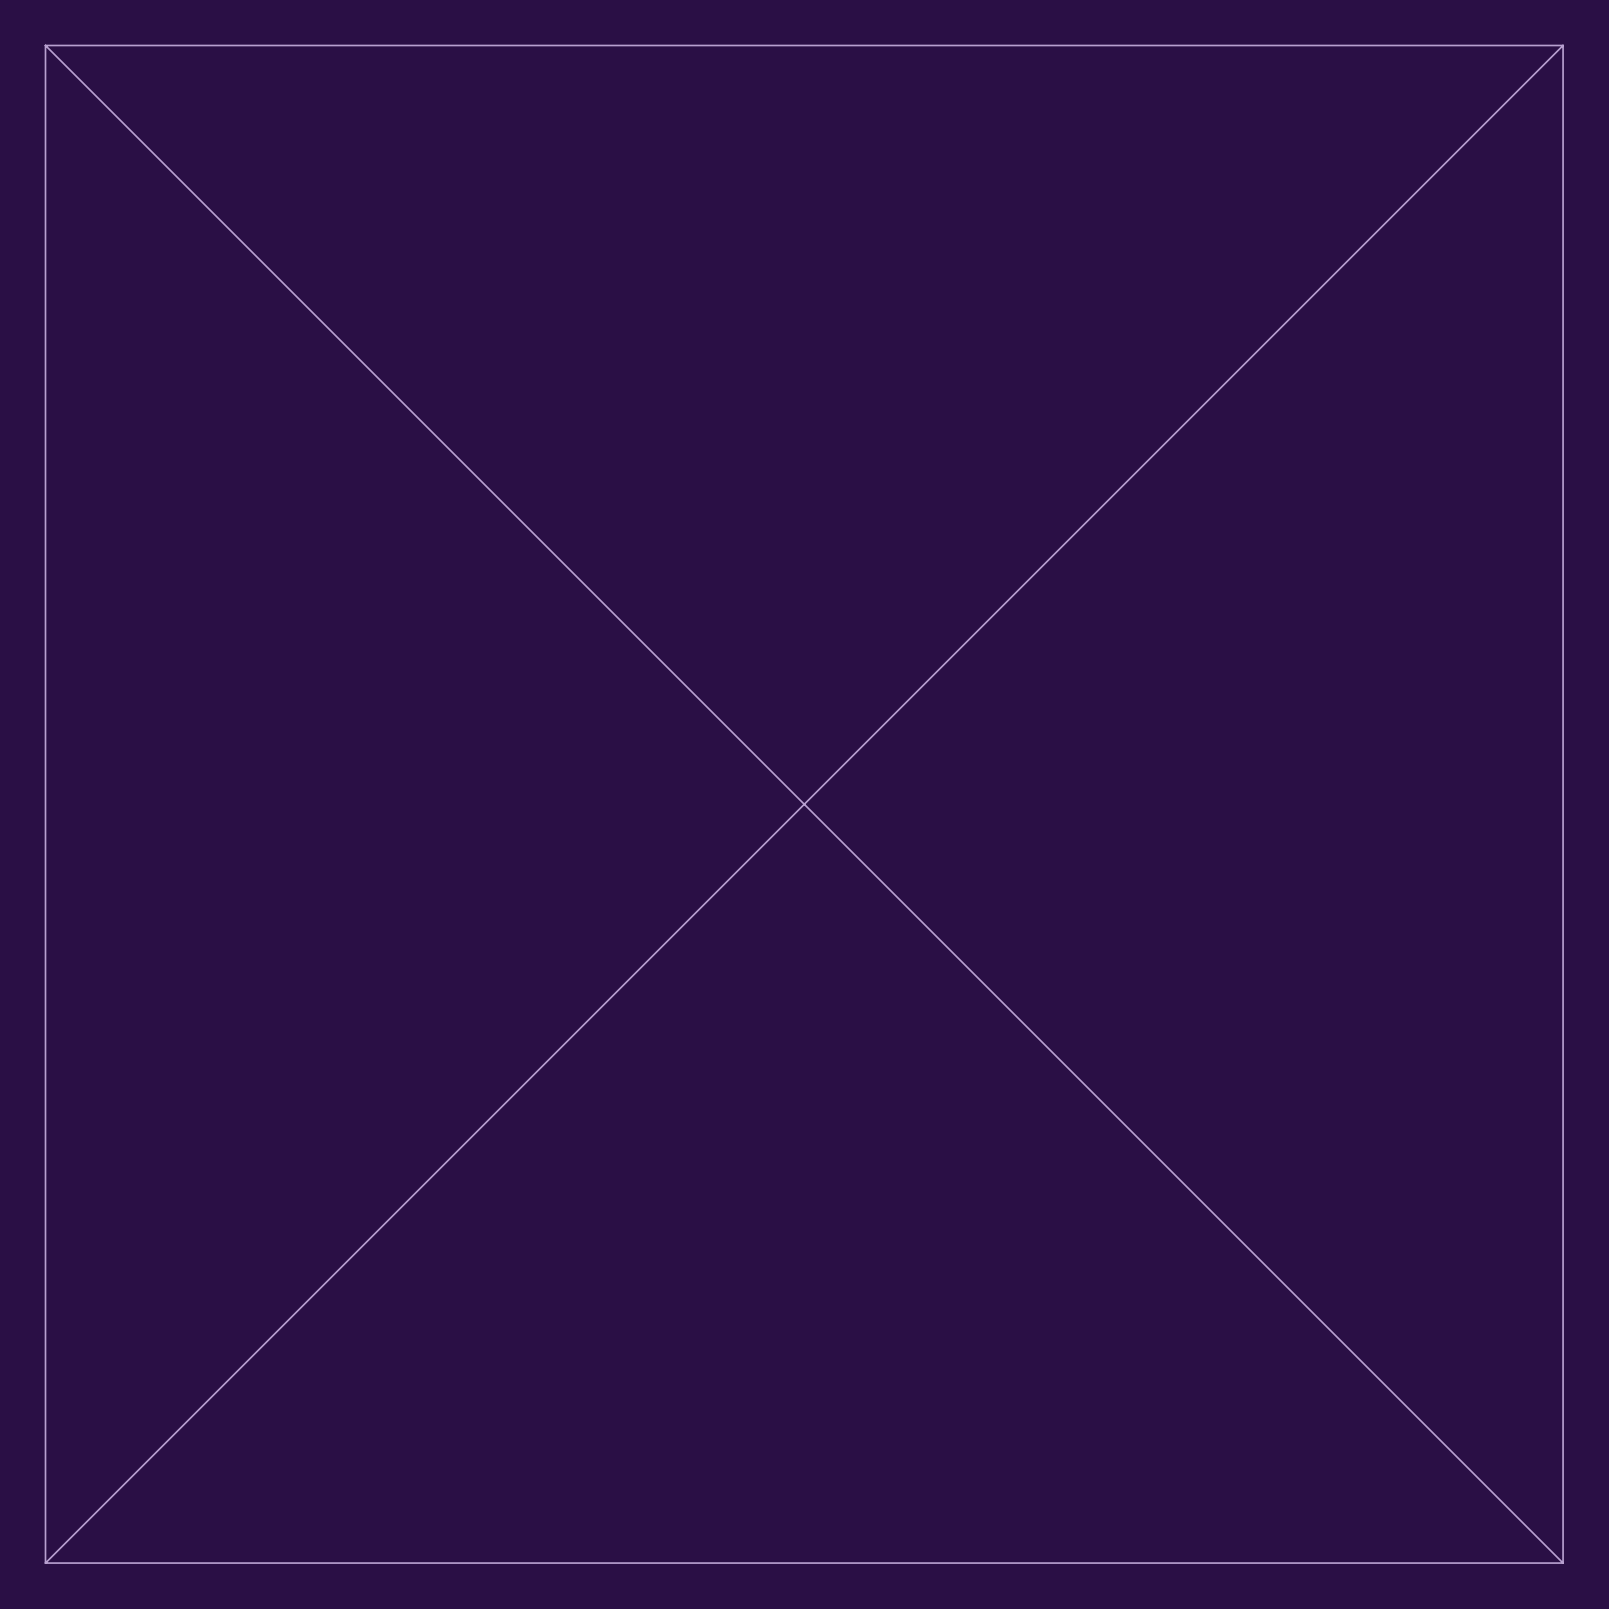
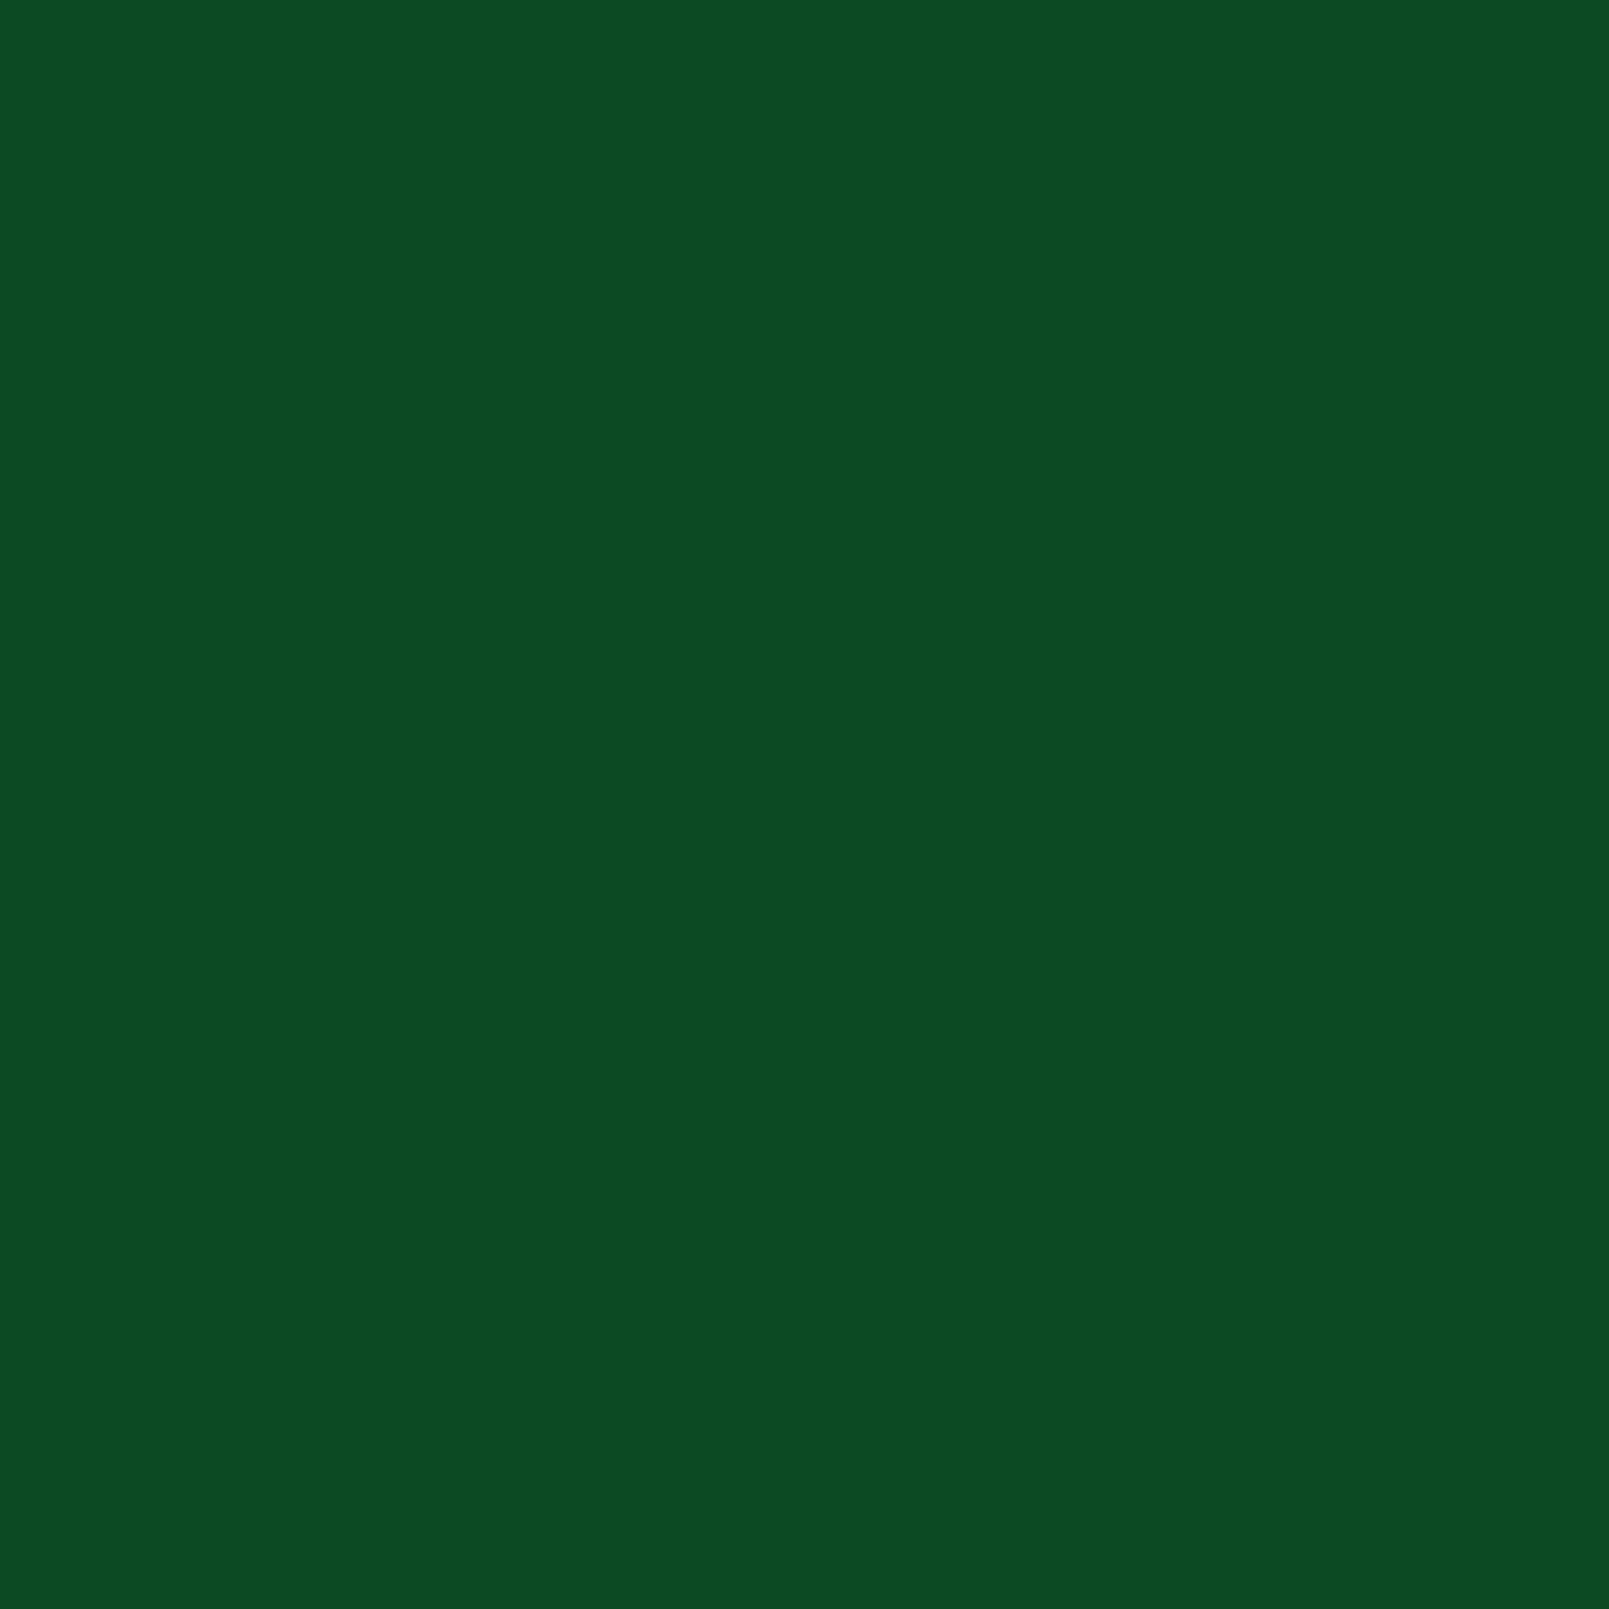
line: (45, 45) (1563, 45) -> none
line: (45, 45) (45, 1563) -> none
line: (45, 45) (1563, 1563) -> none
line: (1563, 45) (1563, 1563) -> none
line: (1563, 45) (45, 1563) -> none
line: (45, 1563) (1563, 1563) -> none

